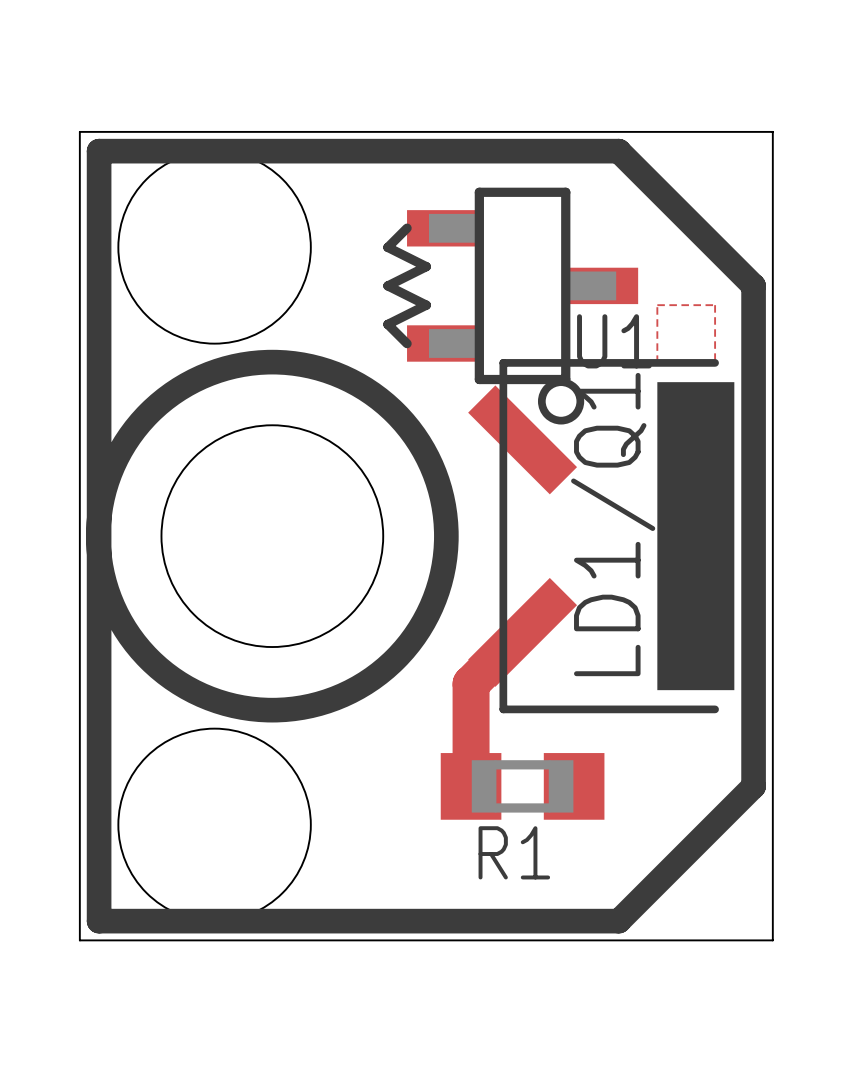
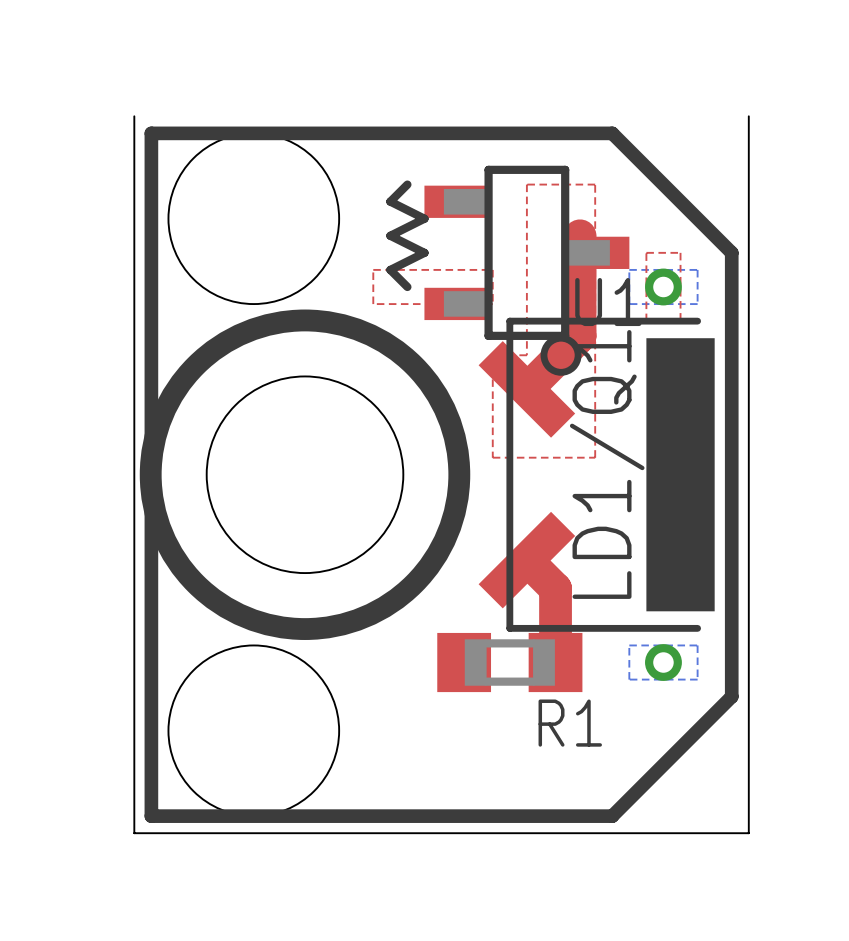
board edge: (79, 131) (772, 131) -> none
line width: thick (99, 151) (618, 151) (753, 285) (753, 786) (618, 921) (99, 921) (99, 151) -> thin (151, 133) (612, 133) (731, 252) (731, 696) (612, 816) (151, 816) (151, 133)
top zone outline: none -> (526, 184) (595, 184) (595, 457) (492, 457) (492, 355) (526, 355) (526, 184)
top track: none -> (580, 235) (580, 336) (526, 389)
part position: (407, 285) -> (407, 235)
top zone outline: none -> (373, 269) (492, 269) (492, 304) (373, 304) (373, 269)
bottom zone outline: none -> (629, 269) (697, 269) (697, 304) (629, 304) (629, 269)
top zone outline: (657, 305) (715, 305) (715, 362) (695, 362) -> (646, 269) (646, 252) (680, 252) (680, 321)
via: none -> (663, 286)
top track: (522, 632) (471, 683) (471, 786) -> (526, 560) (555, 588) (555, 662)
bottom zone outline: none -> (629, 645) (629, 679) (697, 679) (697, 645) (629, 645)
via: none -> (663, 662)
R1 position: (522, 786) -> (509, 662)
R1 name position: R1 (514, 852) -> R1 (570, 723)

